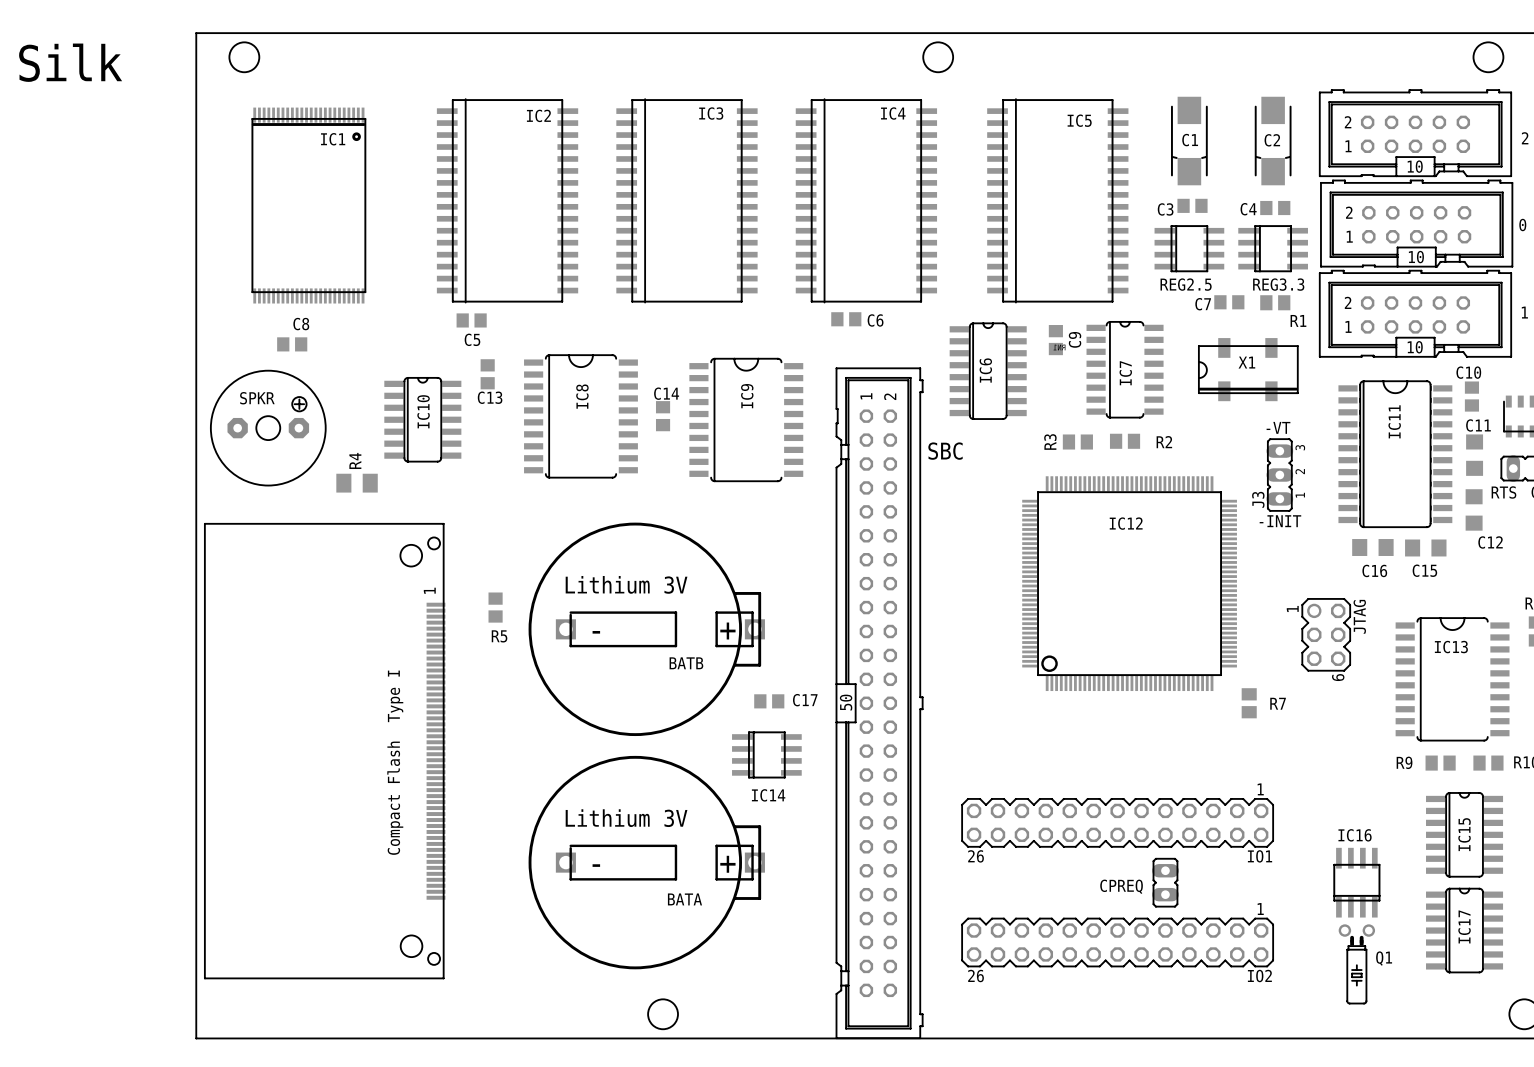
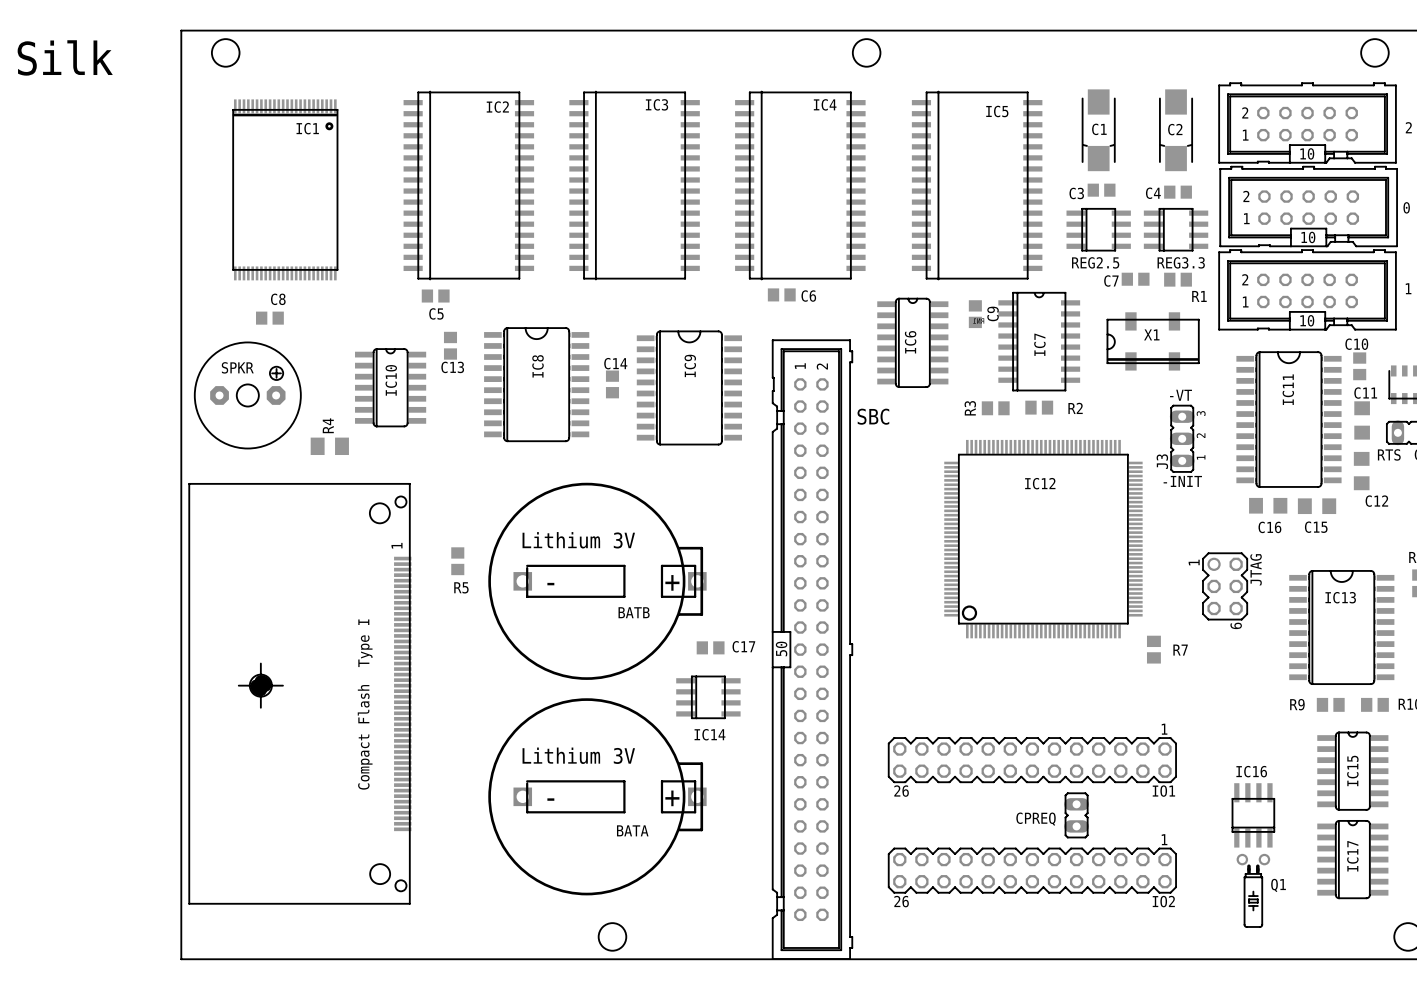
IC7 footprint: [1086, 321, 1164, 419] -> [998, 291, 1081, 392]
IC8 footprint: [524, 354, 638, 479] -> [484, 327, 590, 442]
IC9 footprint: [689, 358, 804, 482] -> [636, 330, 742, 446]
IC13 footprint: [1395, 617, 1510, 742] -> [1289, 570, 1395, 685]
drawing: none -> [238, 662, 284, 709]

